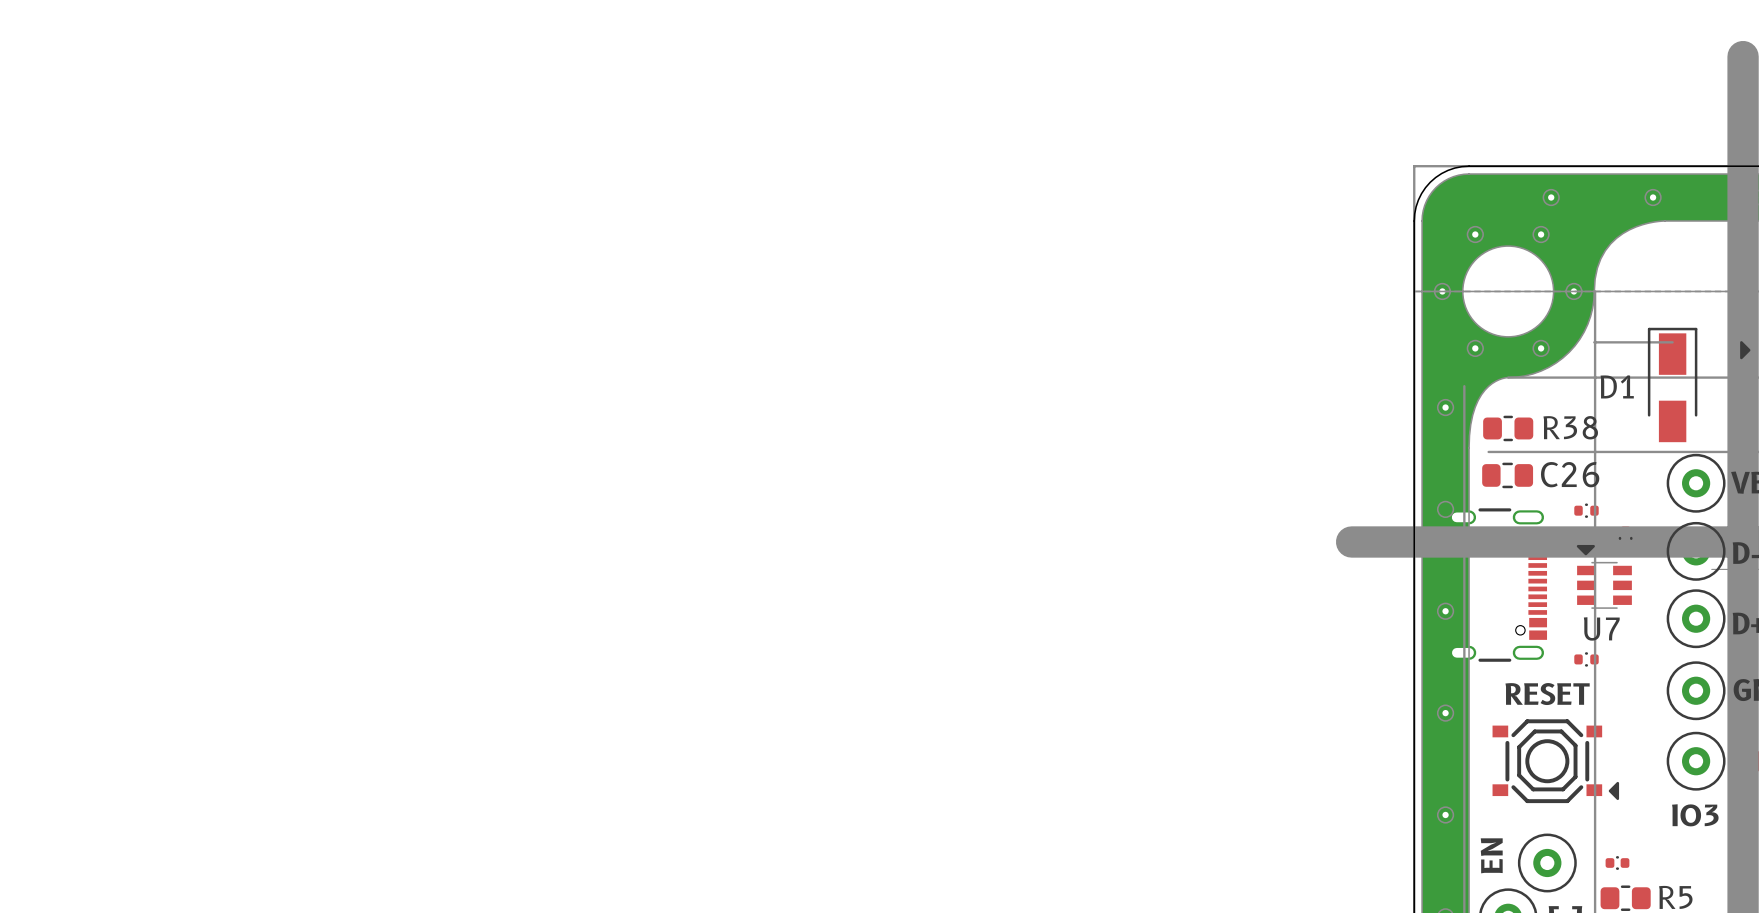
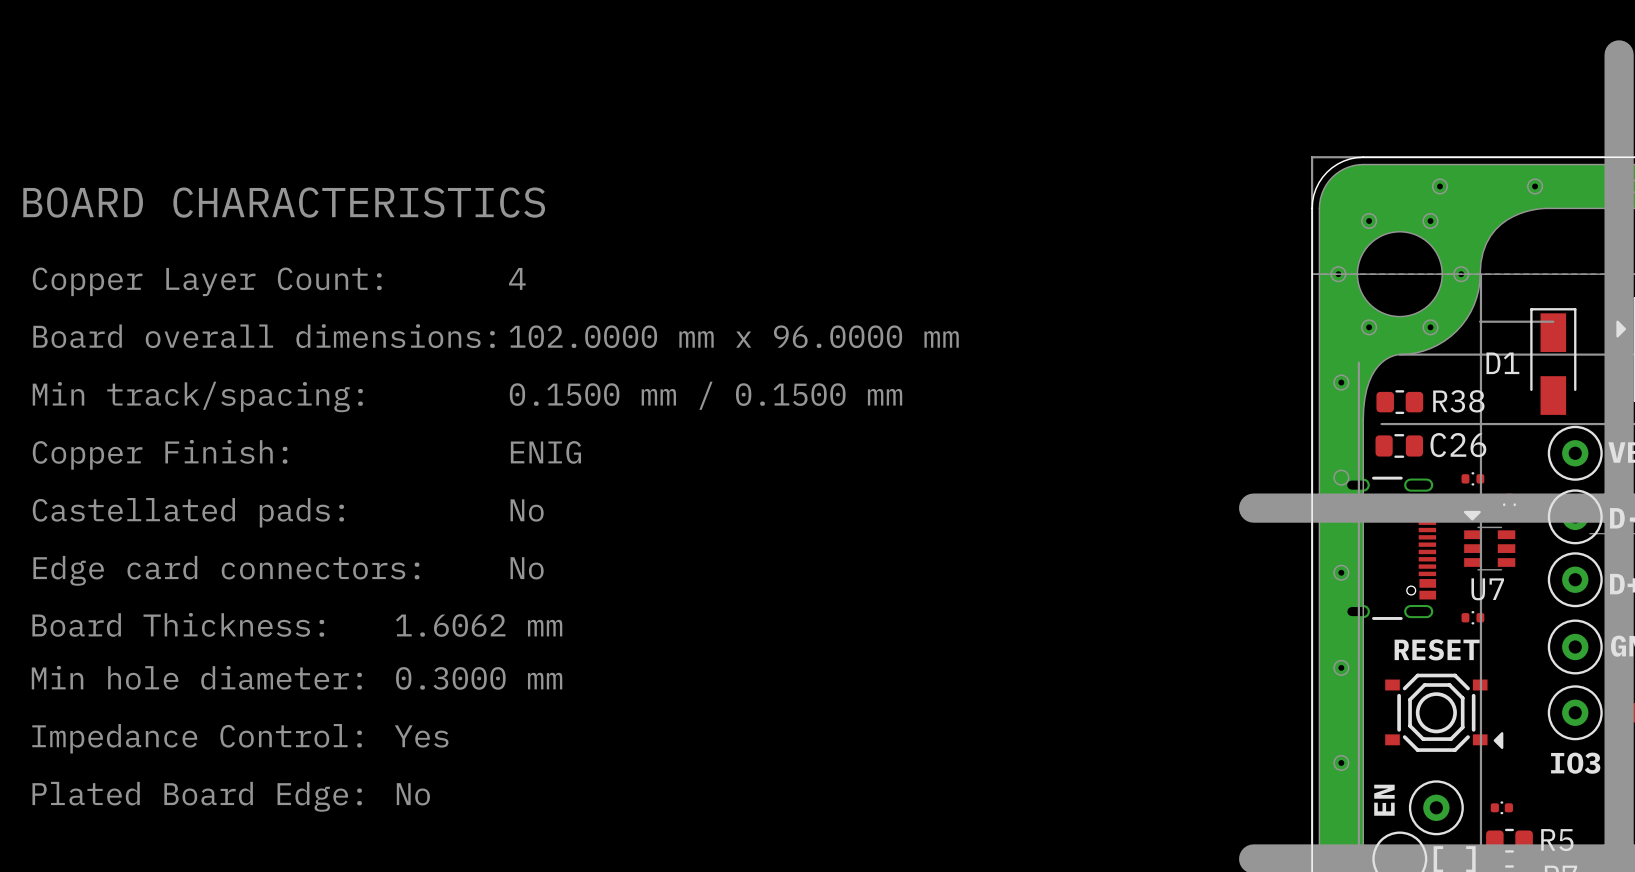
text: none -> BOARD CHARACTERISTICS (284, 202)
text: none -> 4 (517, 278)
text: none -> Copper Layer Count: (207, 281)
text: none -> Board overall dimensions: (264, 336)
text: none -> 102.0000 mm x 96.0000 mm (734, 336)
text: none -> 0.1500 mm / 0.1500 mm (705, 395)
text: none -> Min track/spacing: (197, 396)
text: none -> ENIG (545, 452)
text: none -> Copper Finish: (160, 454)
text: none -> No (527, 510)
text: none -> Castellated pads: (188, 512)
text: none -> No (527, 568)
text: none -> Edge card connectors: (226, 570)
text: none -> Board Thickness: (178, 624)
text: none -> 1.6062 mm (479, 625)
text: none -> Min hole diameter: (196, 677)
text: none -> 0.3000 mm (479, 678)
text: none -> Yes (421, 736)
text: none -> Impedance Control: (197, 738)
text: none -> No (413, 794)
text: none -> Plated Board Edge: (197, 796)

